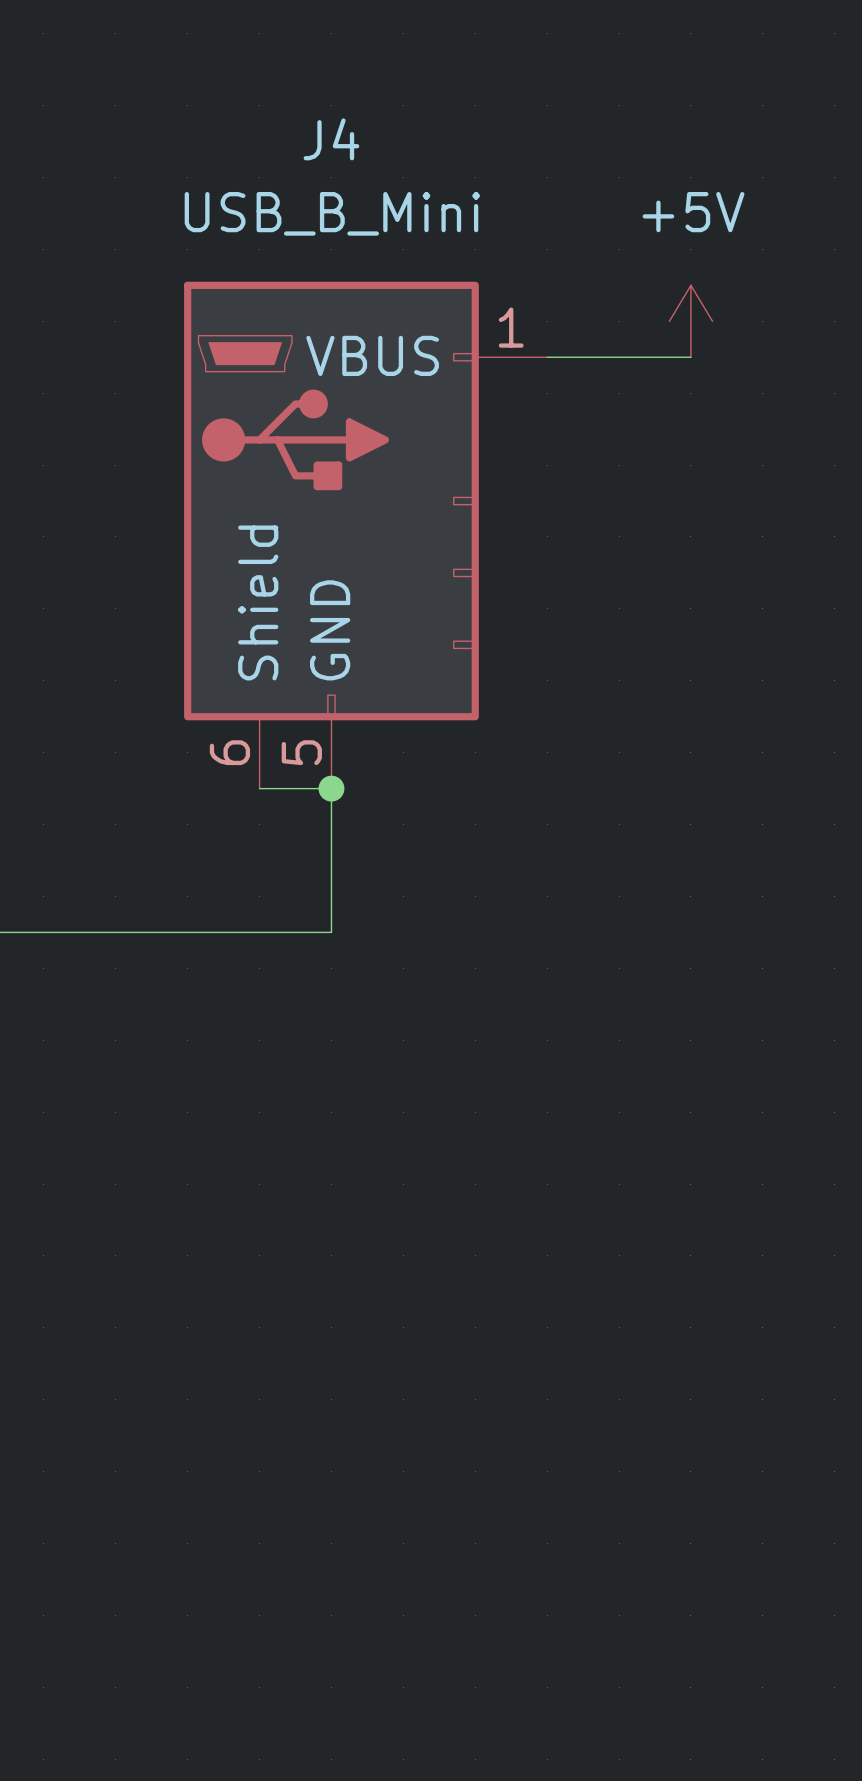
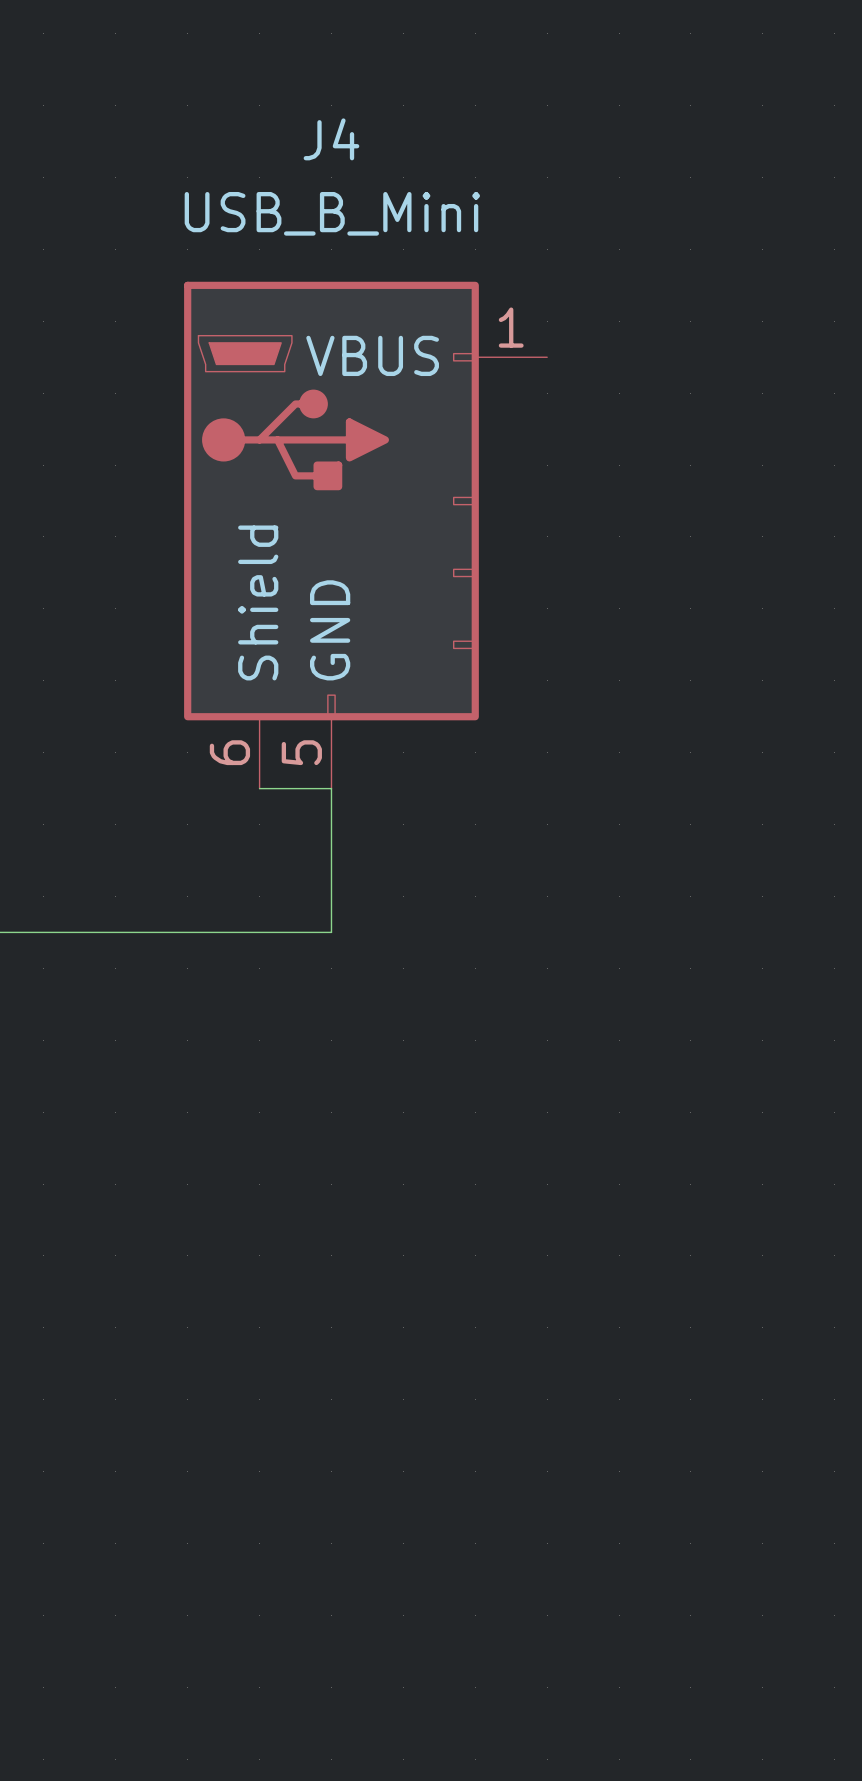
power symbol: +5V (690, 321) -> none
wire: (547, 357) (690, 357) -> none
junction: (331, 788) -> none

